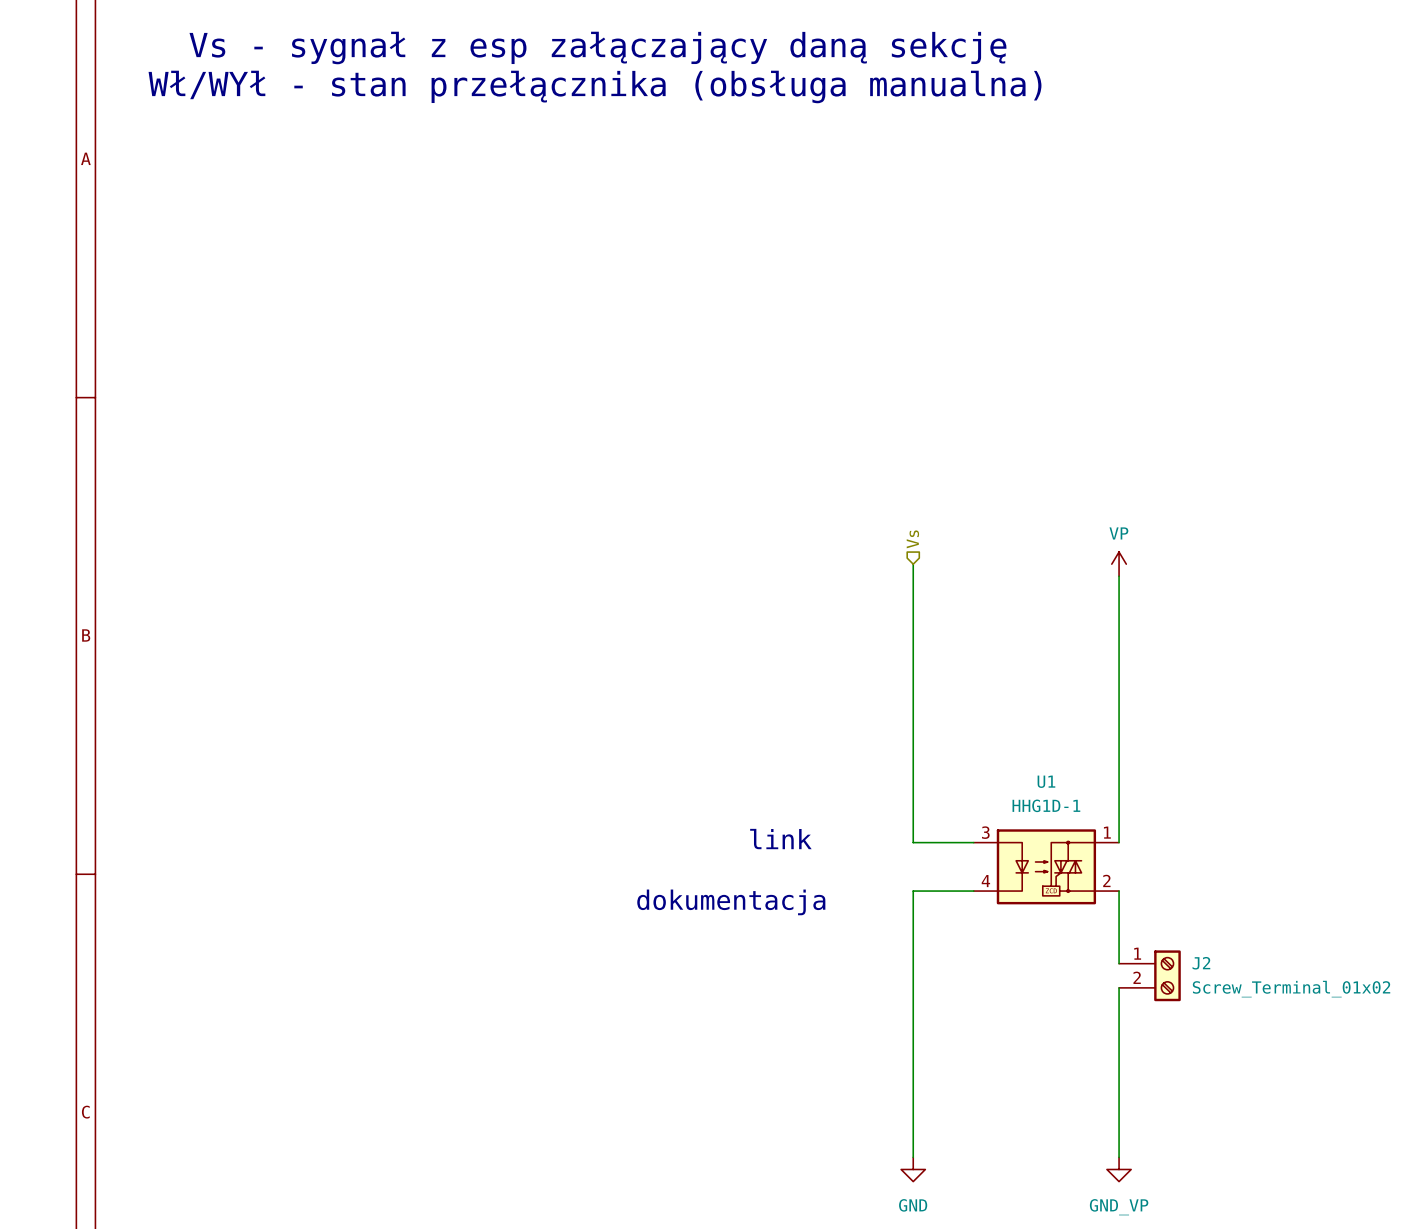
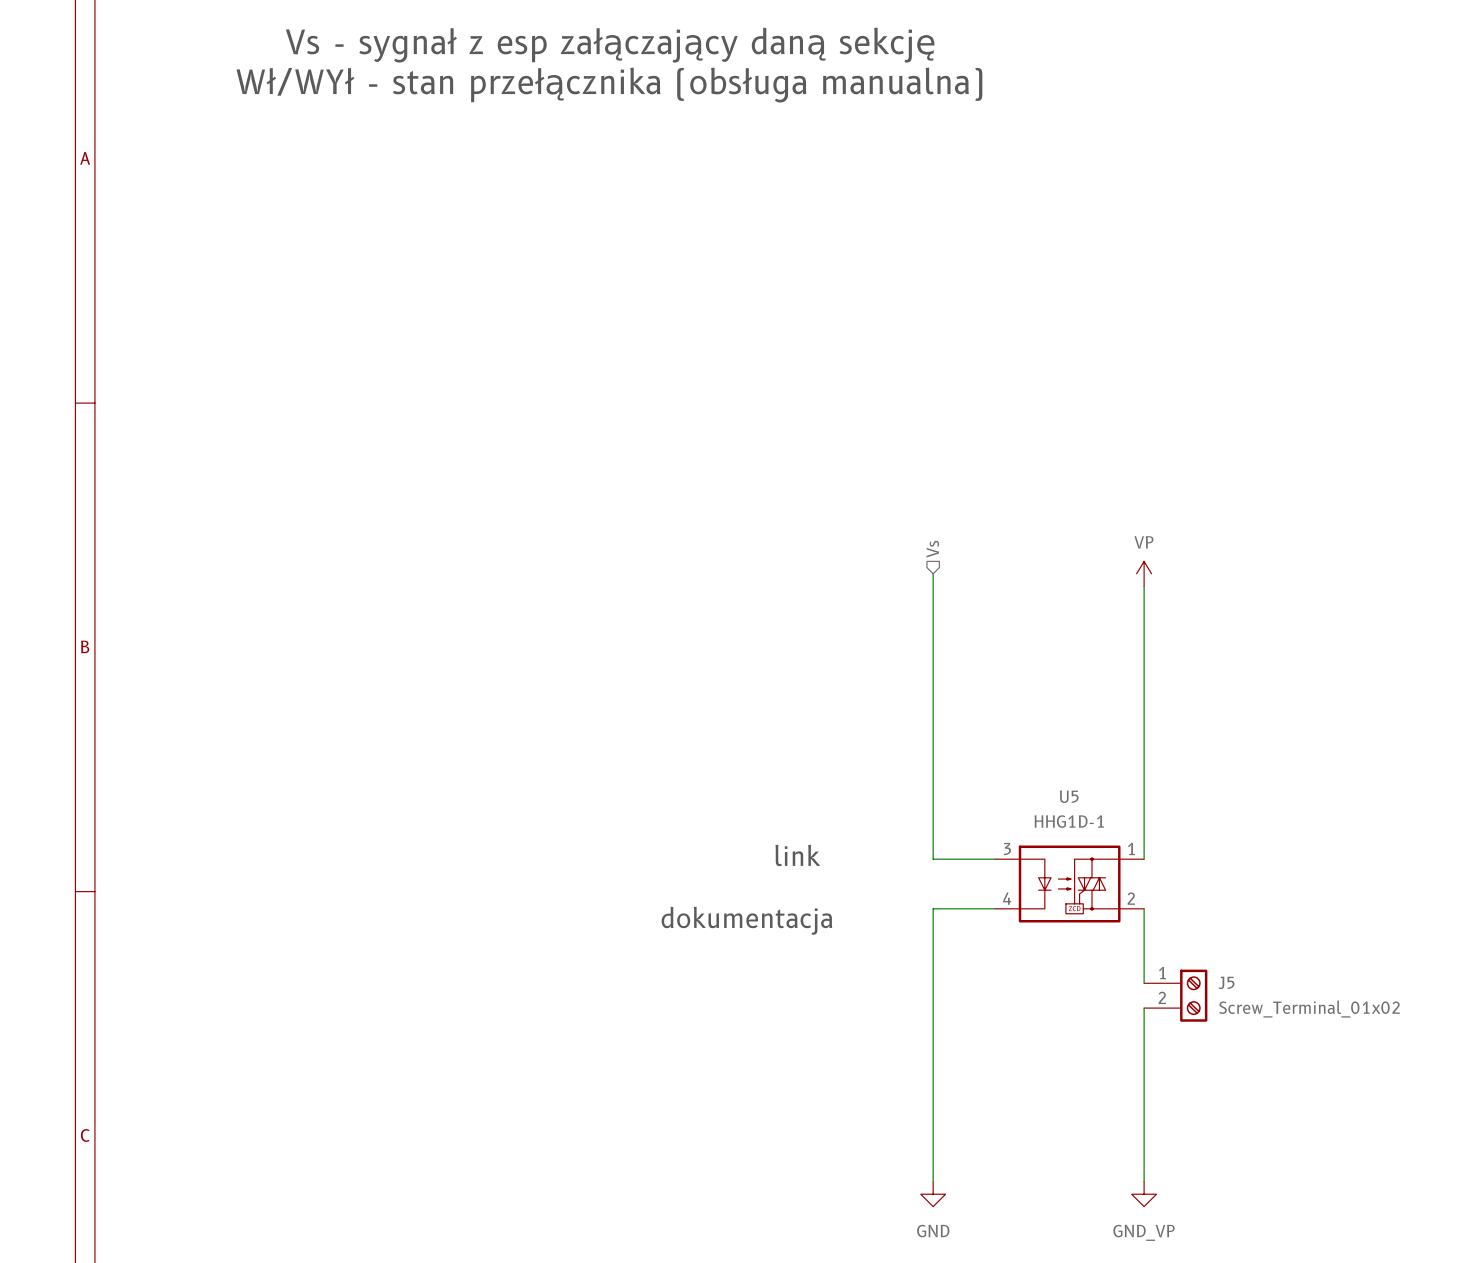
U1 name: U1 (1046, 781) -> U5 (1069, 796)
J2 name: J2 (1201, 963) -> J5 (1226, 982)

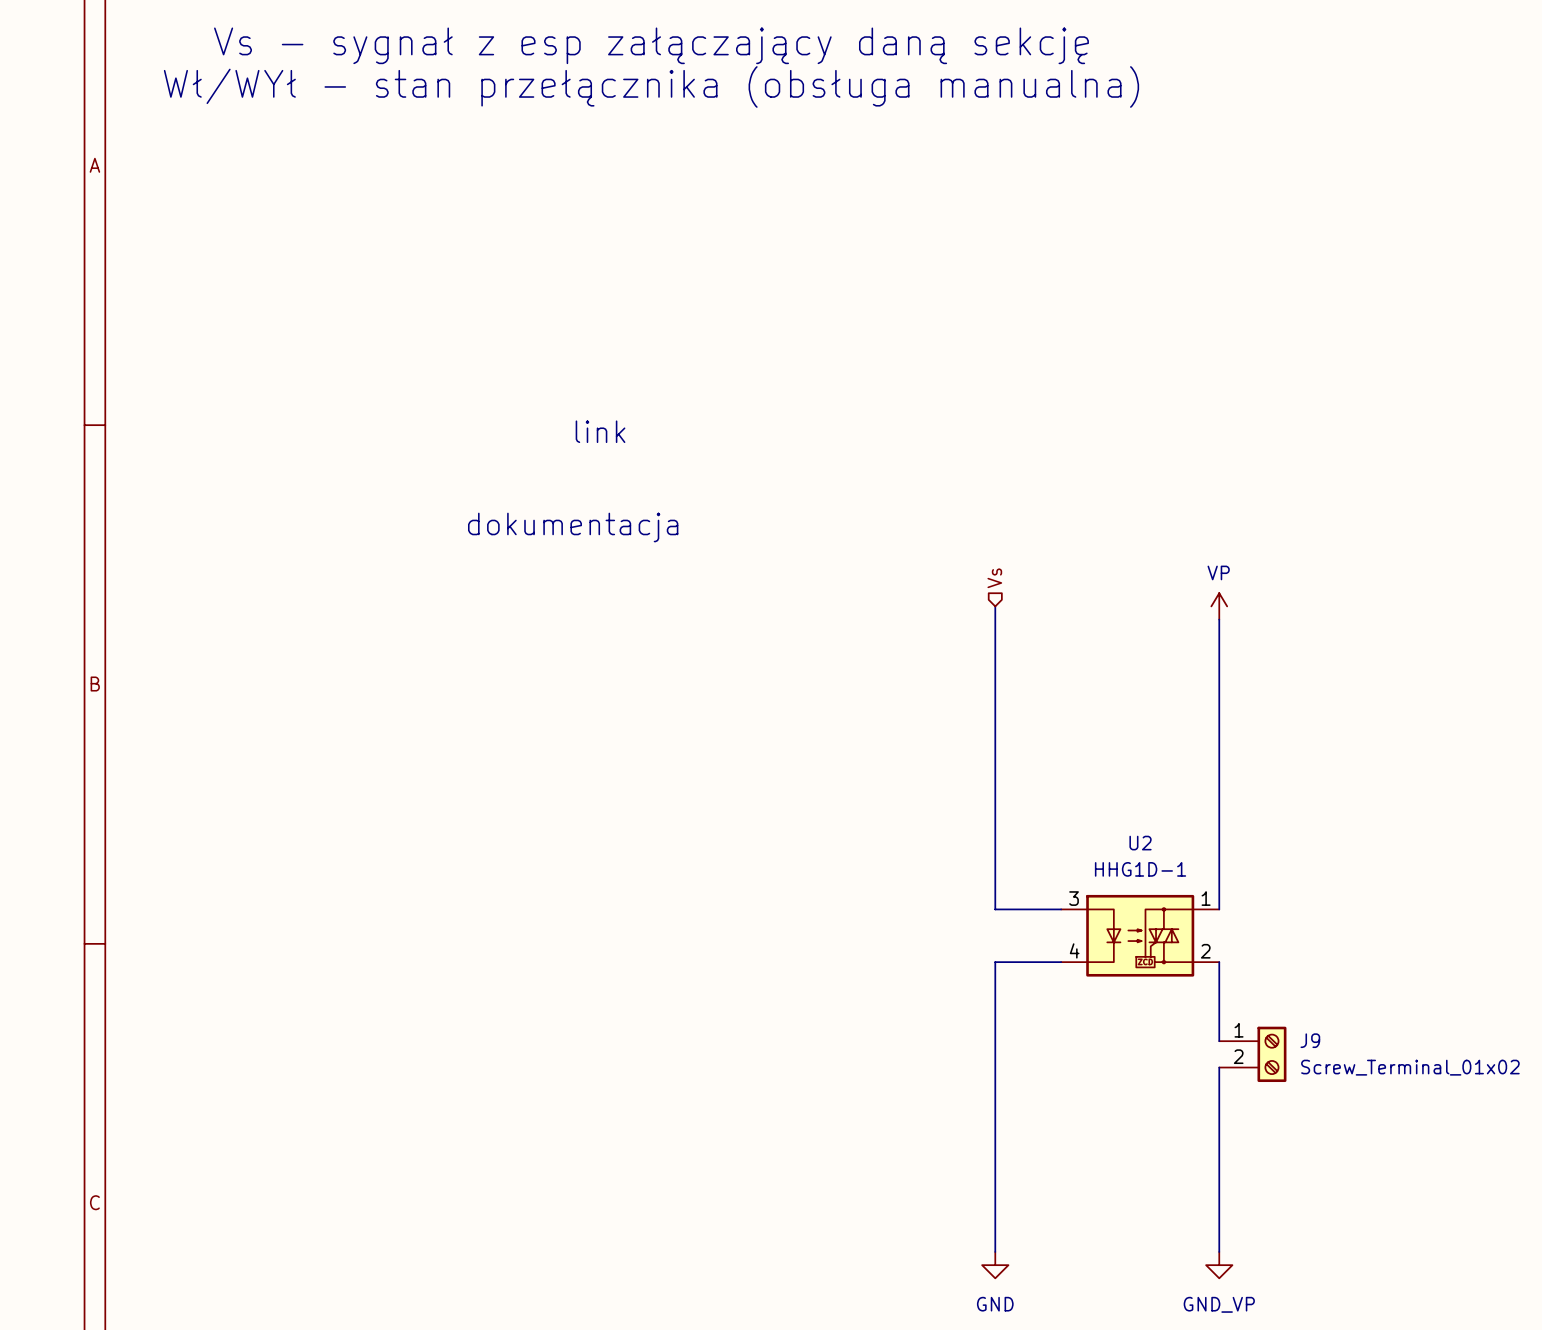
text: none -> link (600, 431)
text: none -> dokumentacja (573, 527)
U5 name: U5 (1069, 796) -> U2 (1140, 843)
text: link (797, 855) -> none
text: dokumentacja (746, 920) -> none
J5 name: J5 (1226, 982) -> J9 (1310, 1040)

